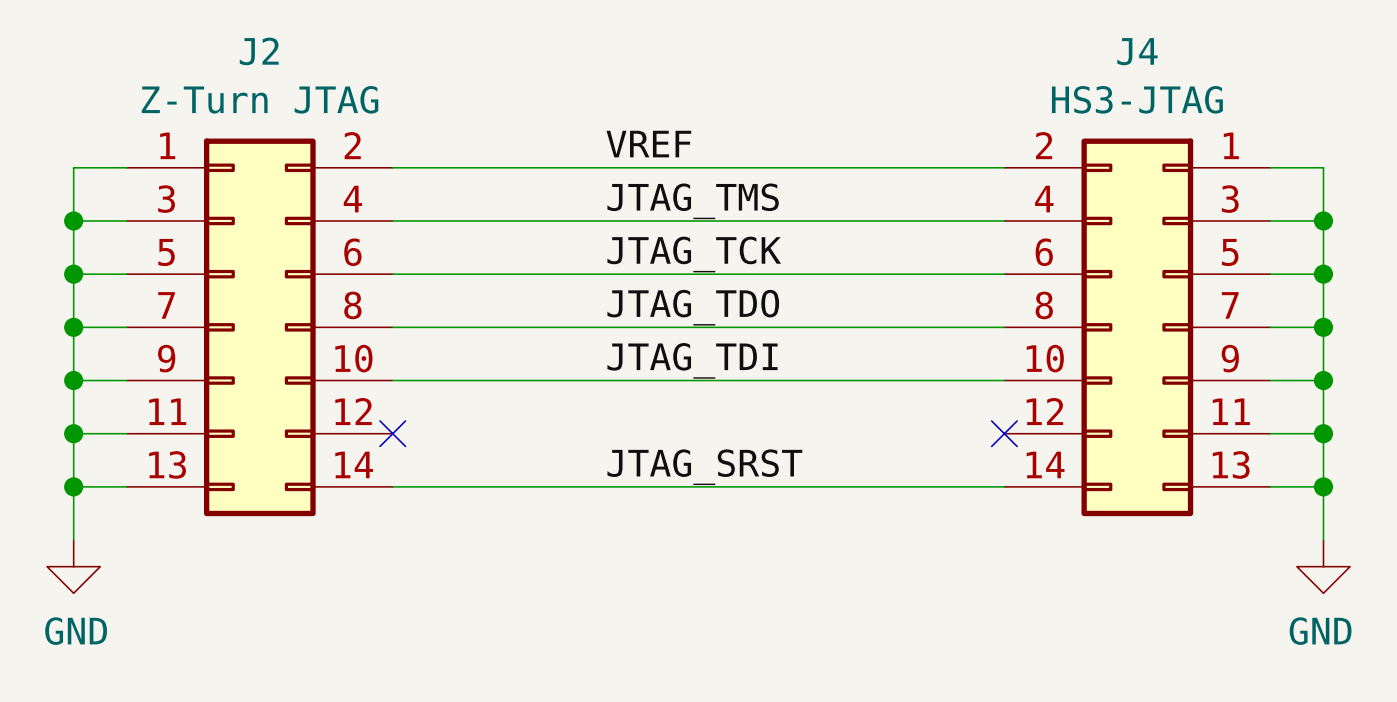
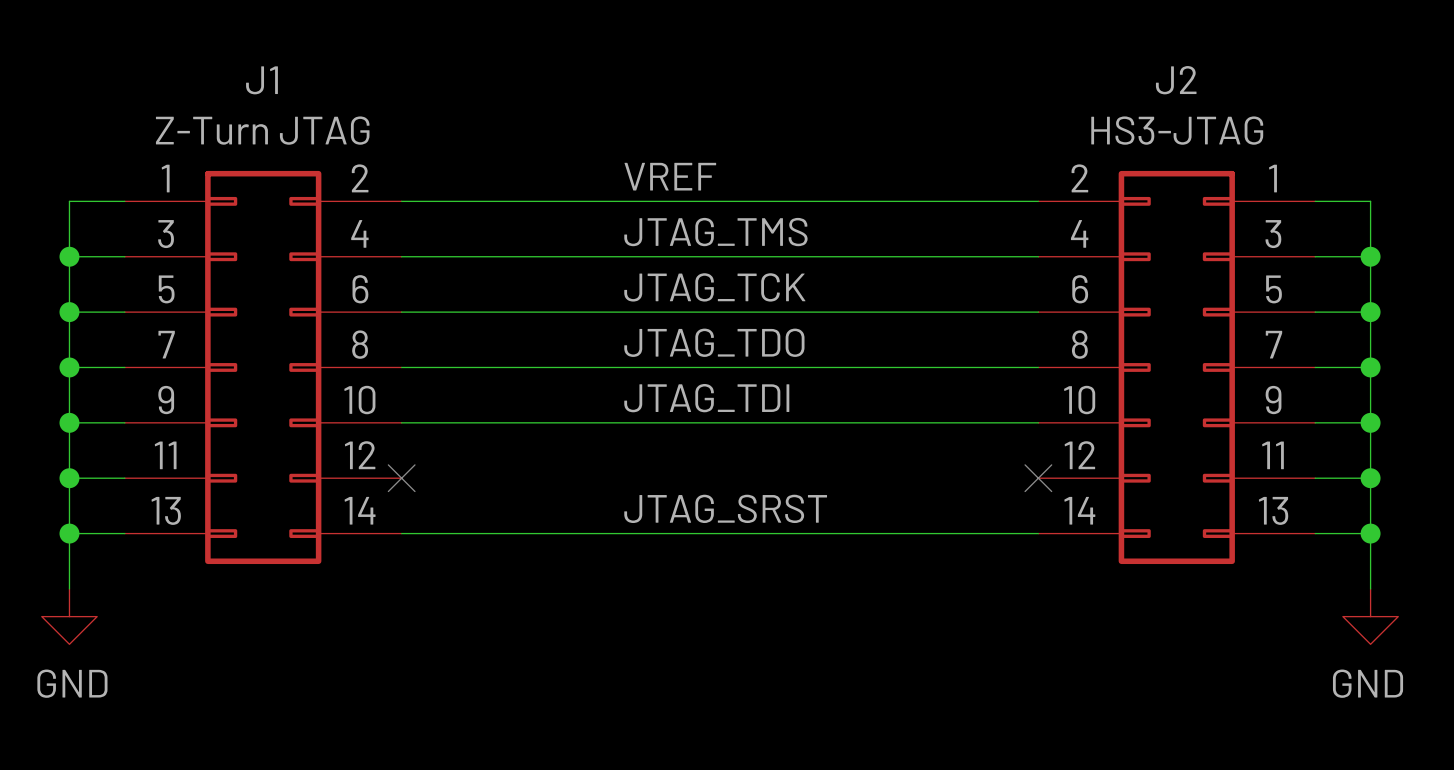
J2 name: J2 (259, 51) -> J1 (261, 80)
J4 name: J4 (1137, 51) -> J2 (1176, 80)

